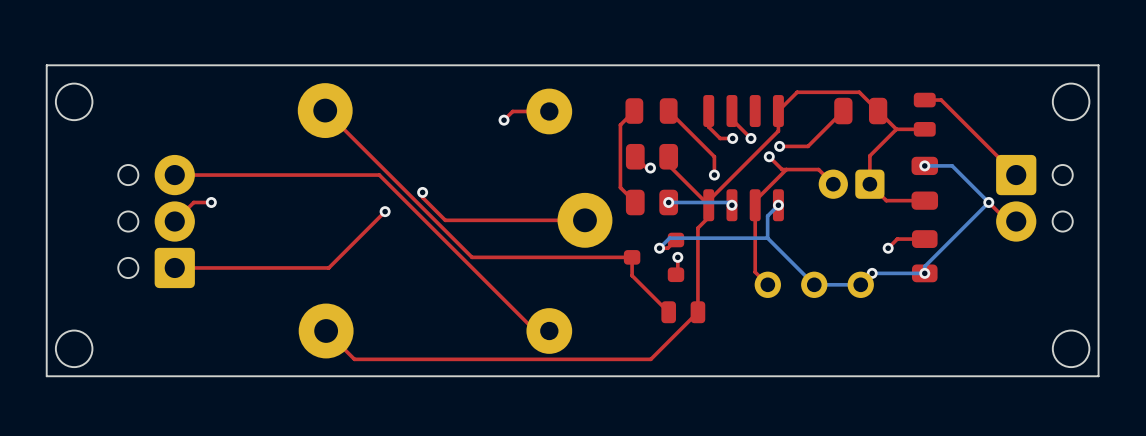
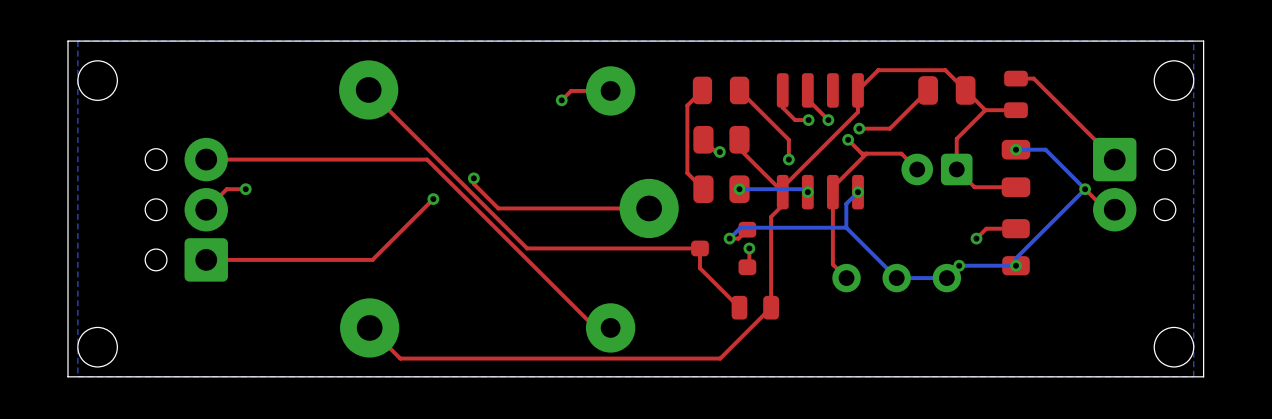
bottom zone outline: none -> (1193, 41) (77, 41) (77, 376) (1193, 376) (1193, 41)

